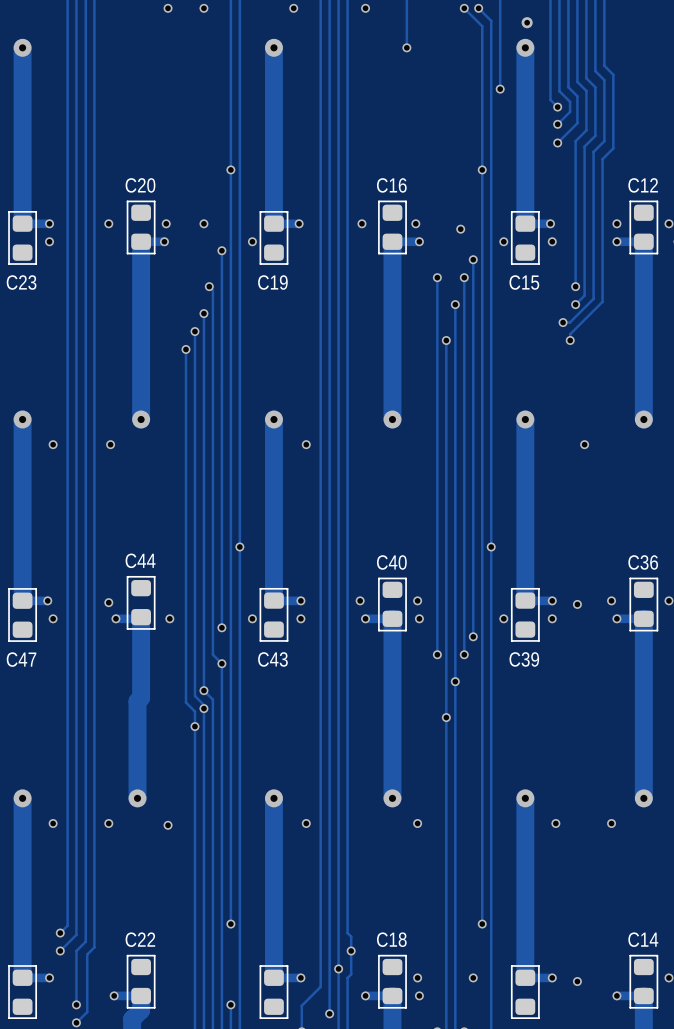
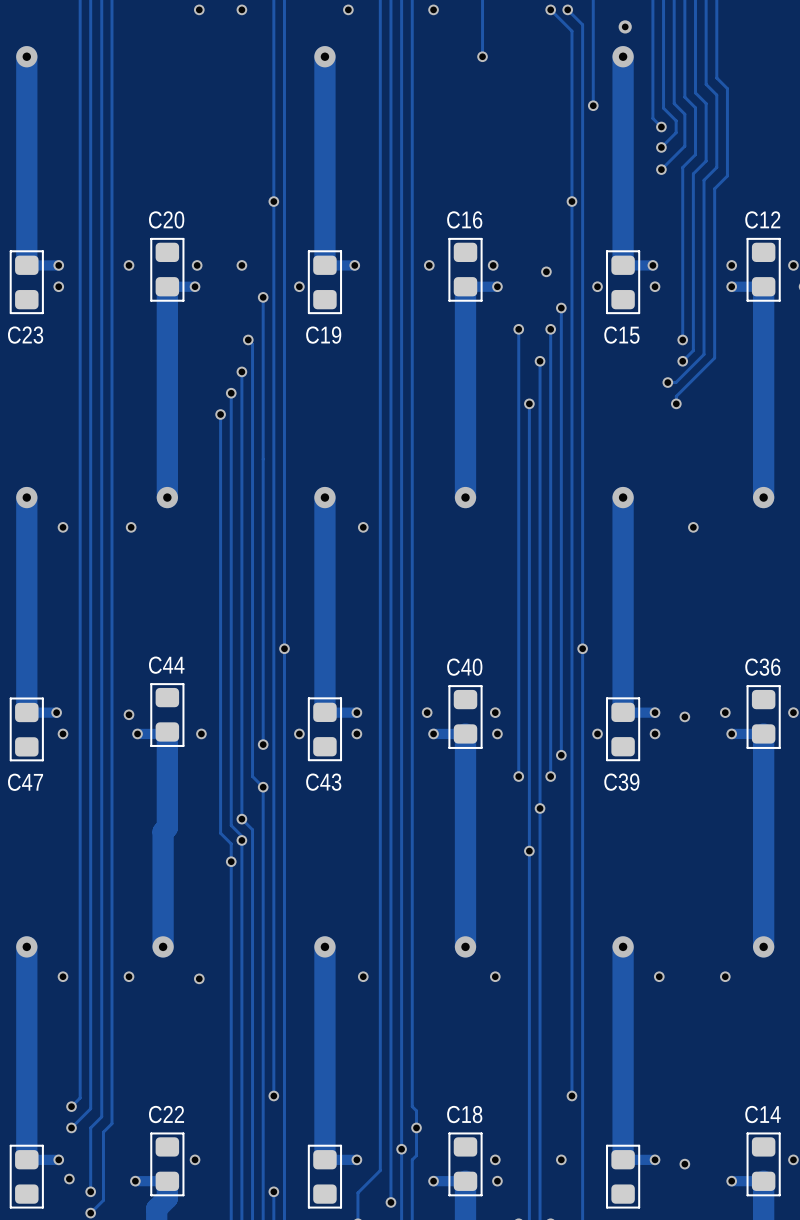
via: none -> (195, 1159)
via: none -> (69, 1179)

